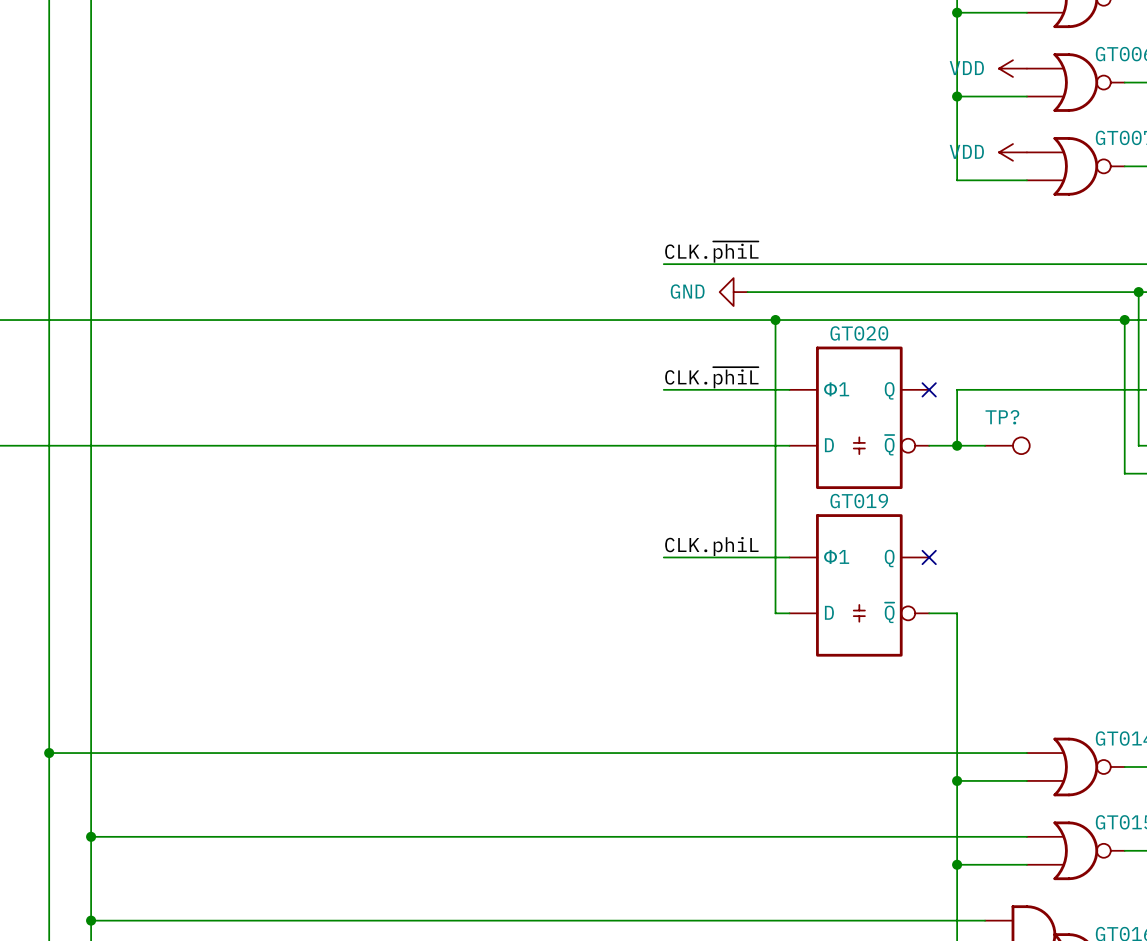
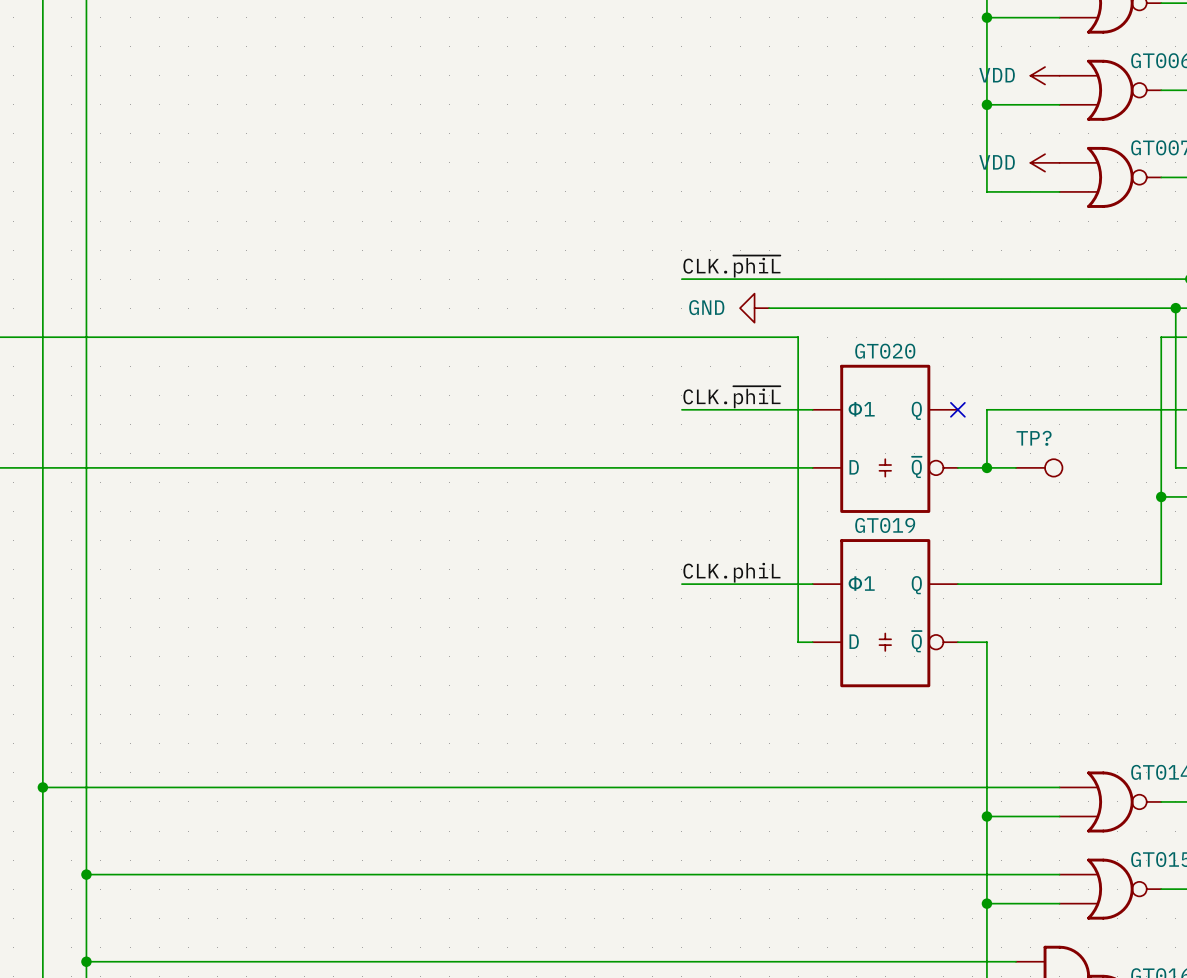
wire: (775, 320) (1124, 320) -> none
junction: (775, 320) -> none
junction: (1124, 320) -> none
wire: none -> (1161, 496) (1161, 584) (957, 584)
junction: none -> (1161, 496)
no-connect mark: (929, 557) -> none

